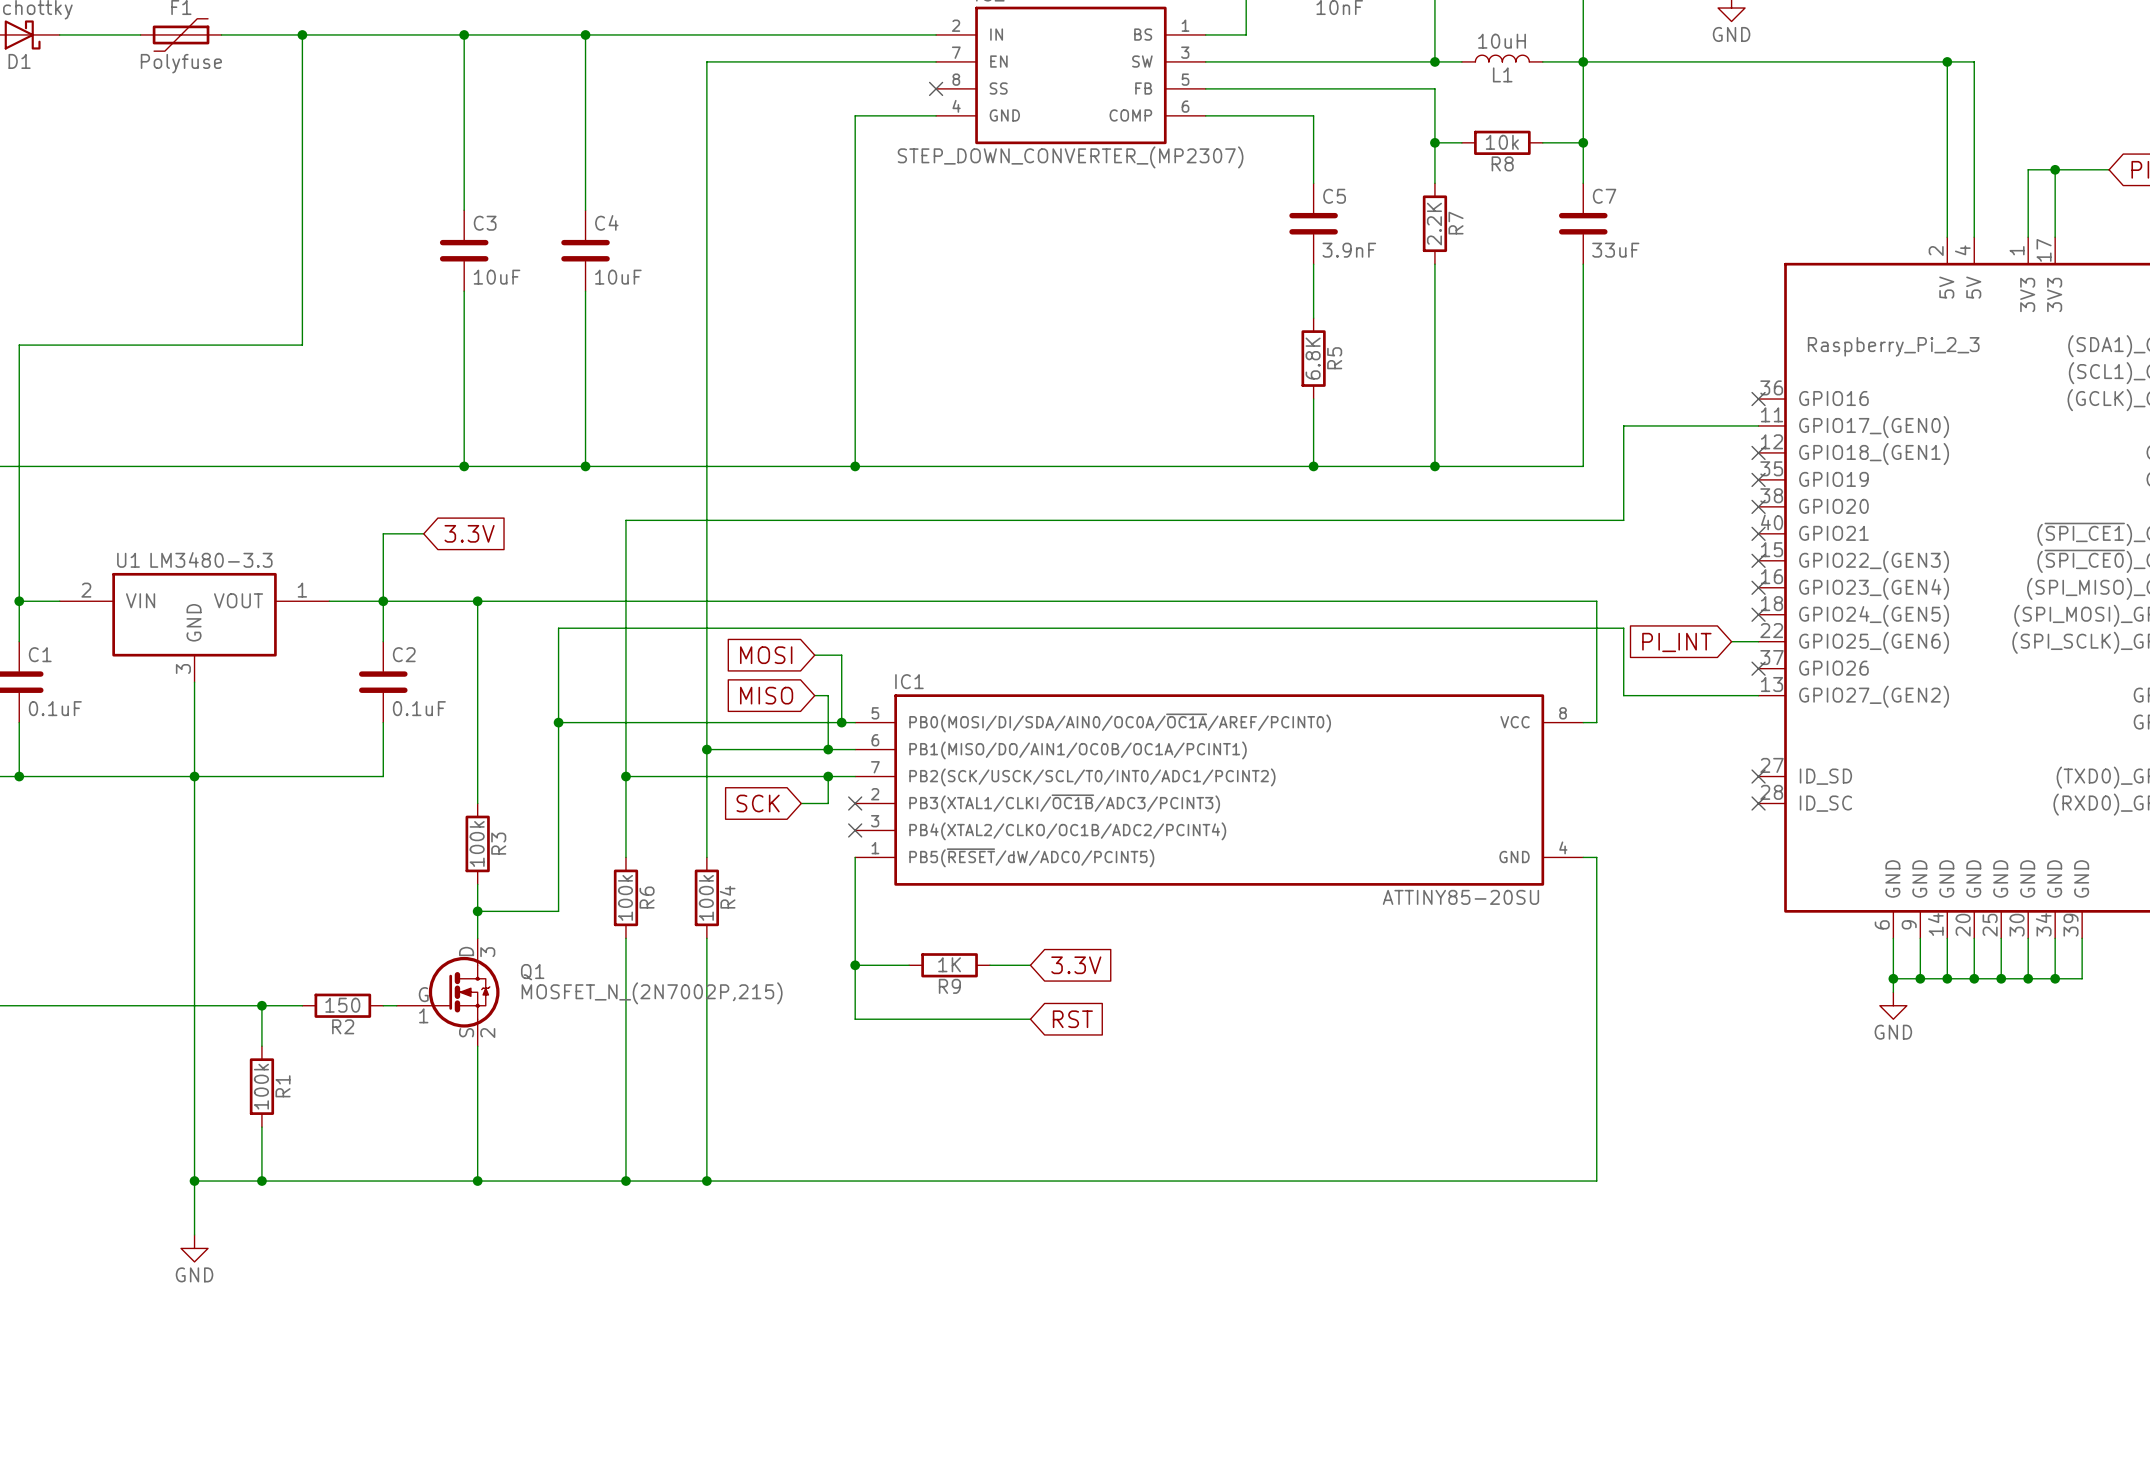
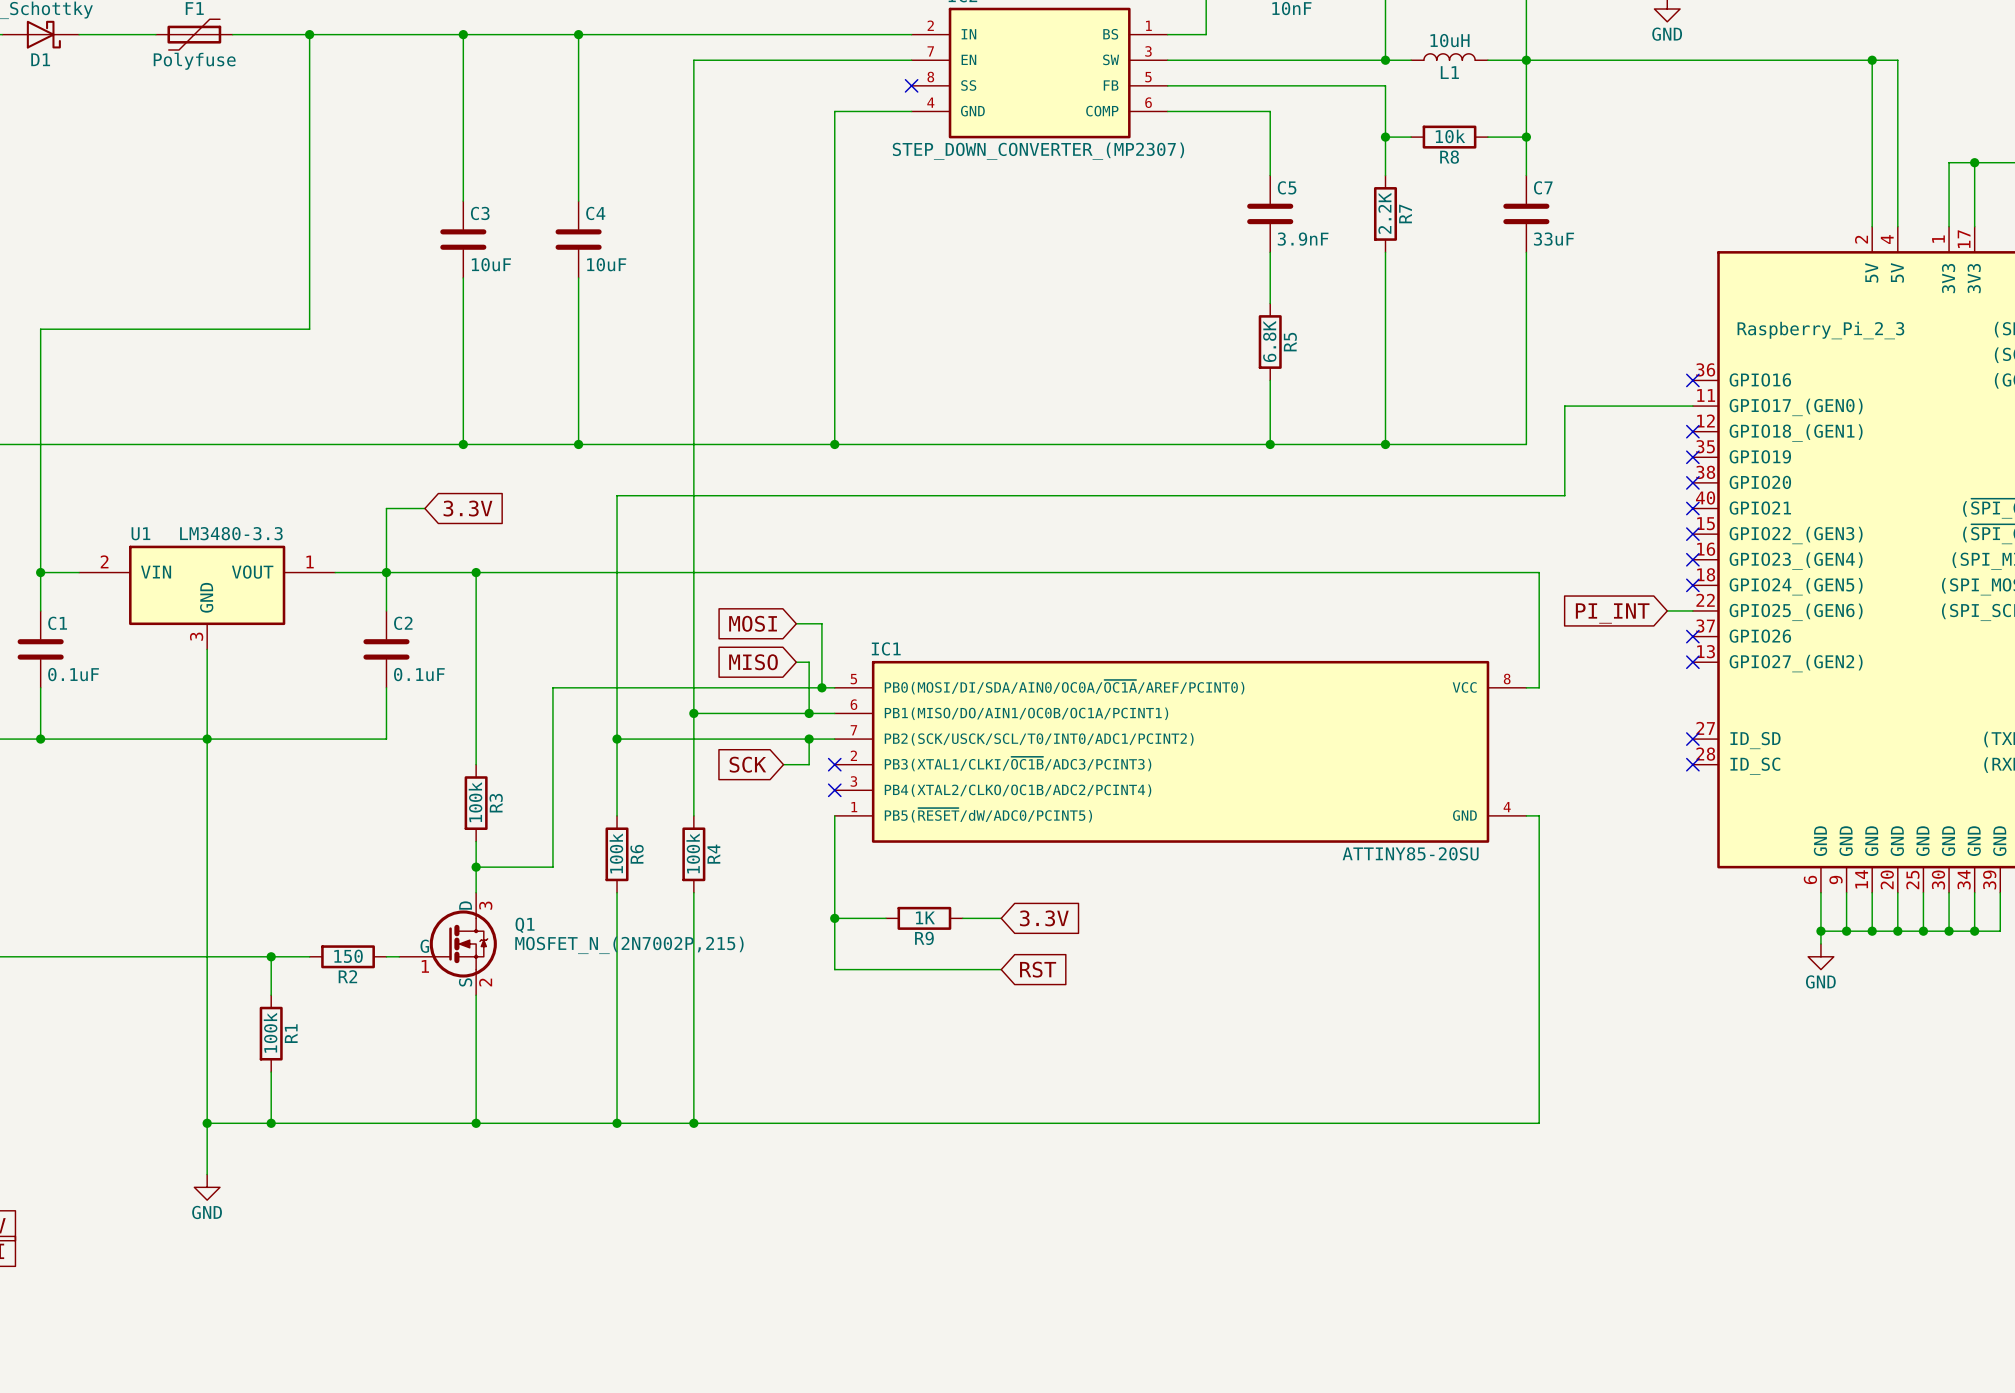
wire: (1758, 695) (1623, 695) (1623, 628) (558, 628) (558, 722) -> none
no-connect mark: none -> (1692, 662)
junction: (558, 722) -> none

